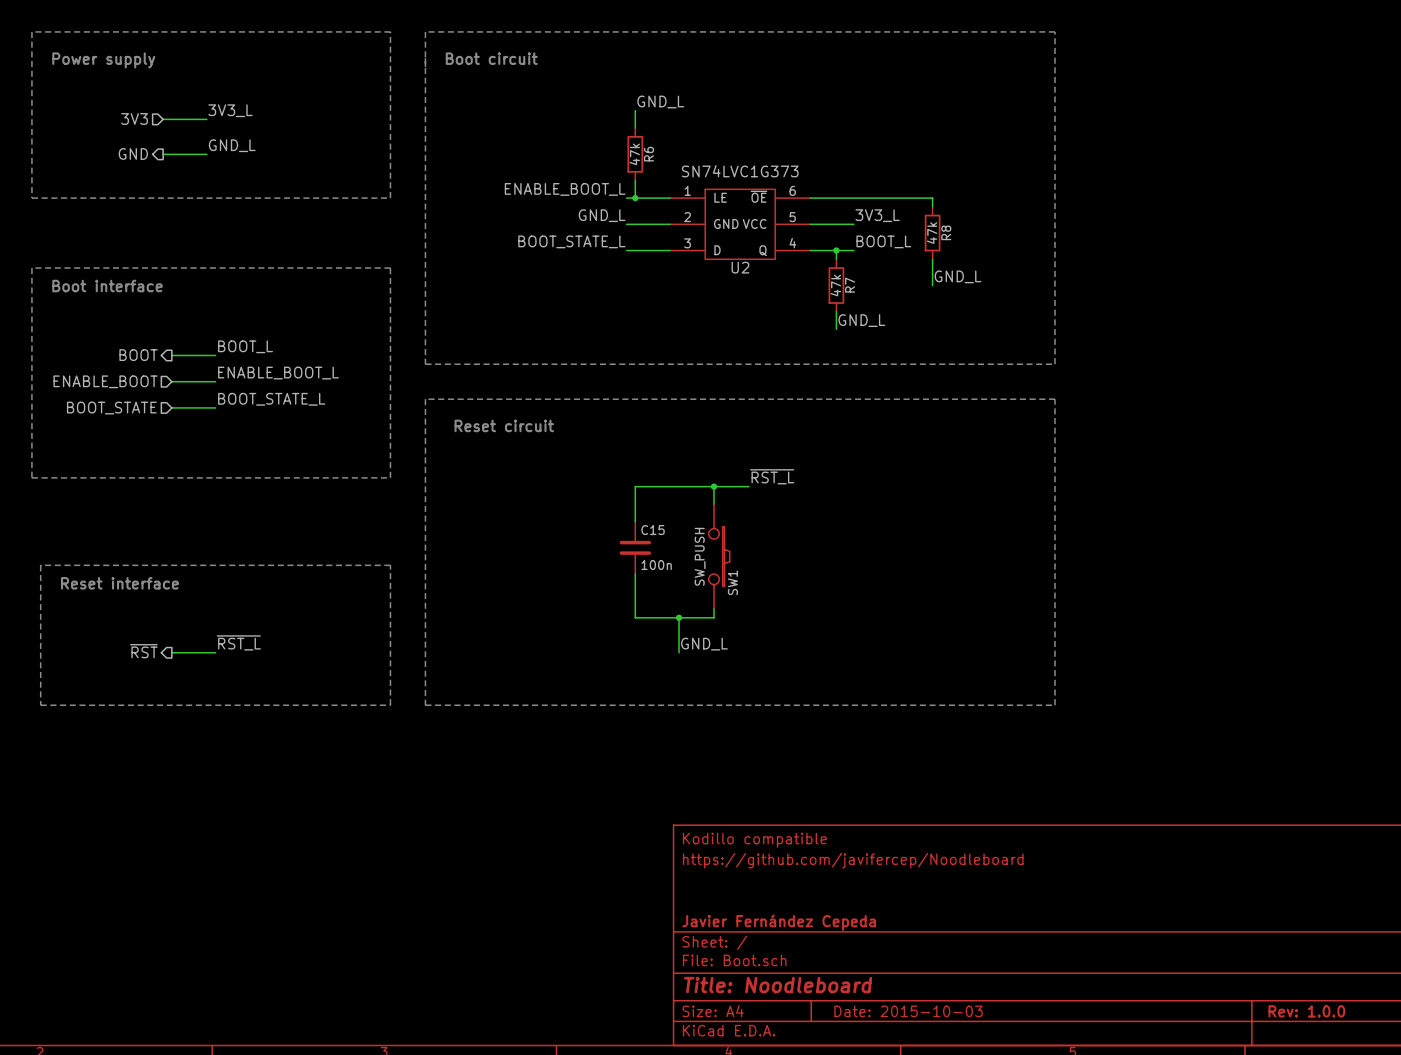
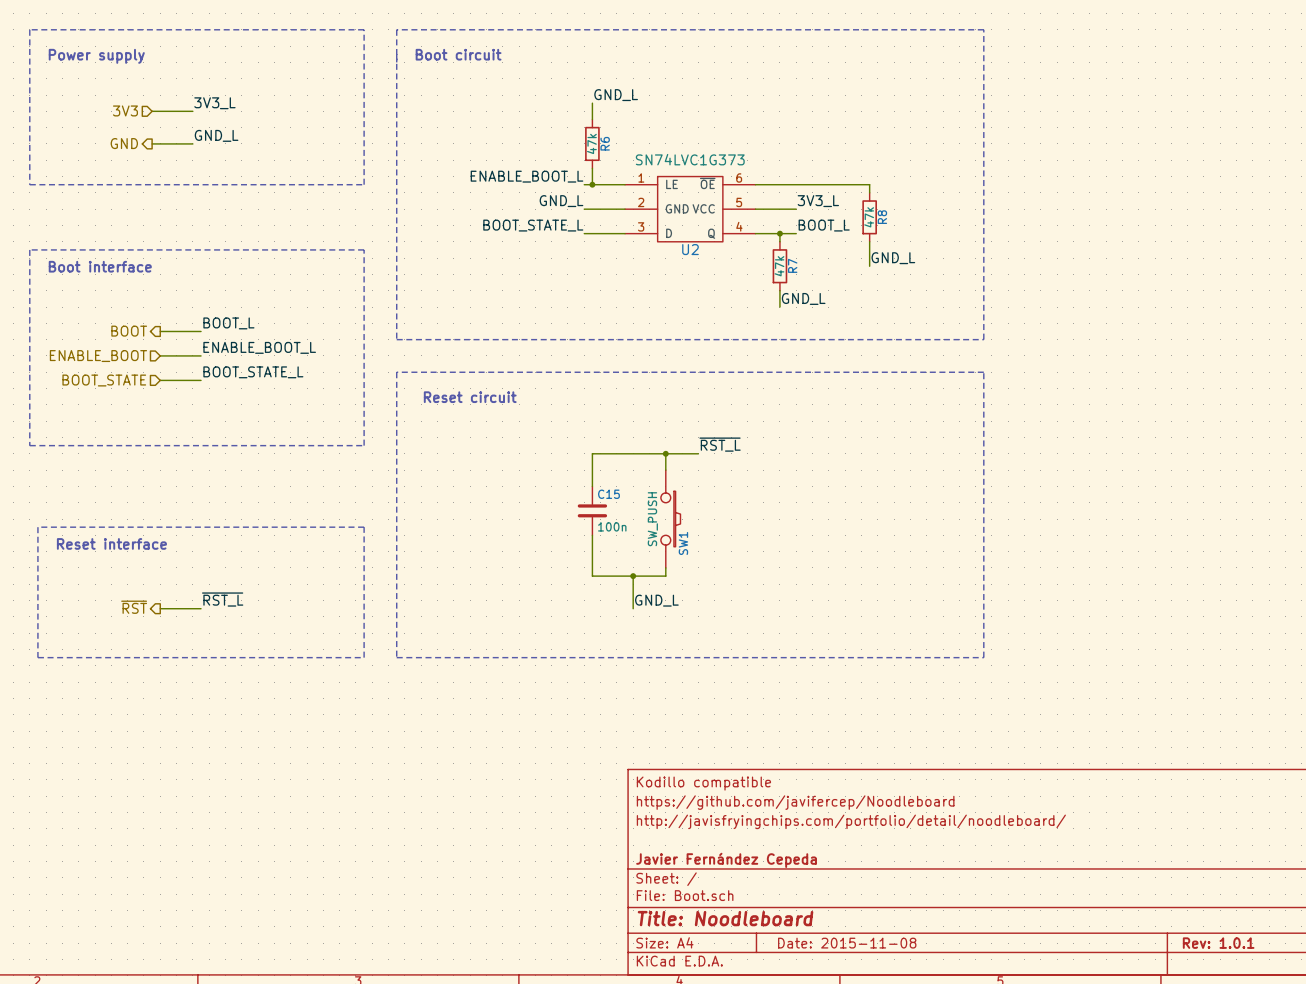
title block: none -> http://javisfryingchips.com/portfolio/detail/noodleboard/ (851, 821)
title block: Date: 2015-10-03 (908, 1011) -> Date: 2015-11-08 (847, 943)
title block: Rev: 1.0.0 (1306, 1011) -> Rev: 1.0.1 (1218, 943)

